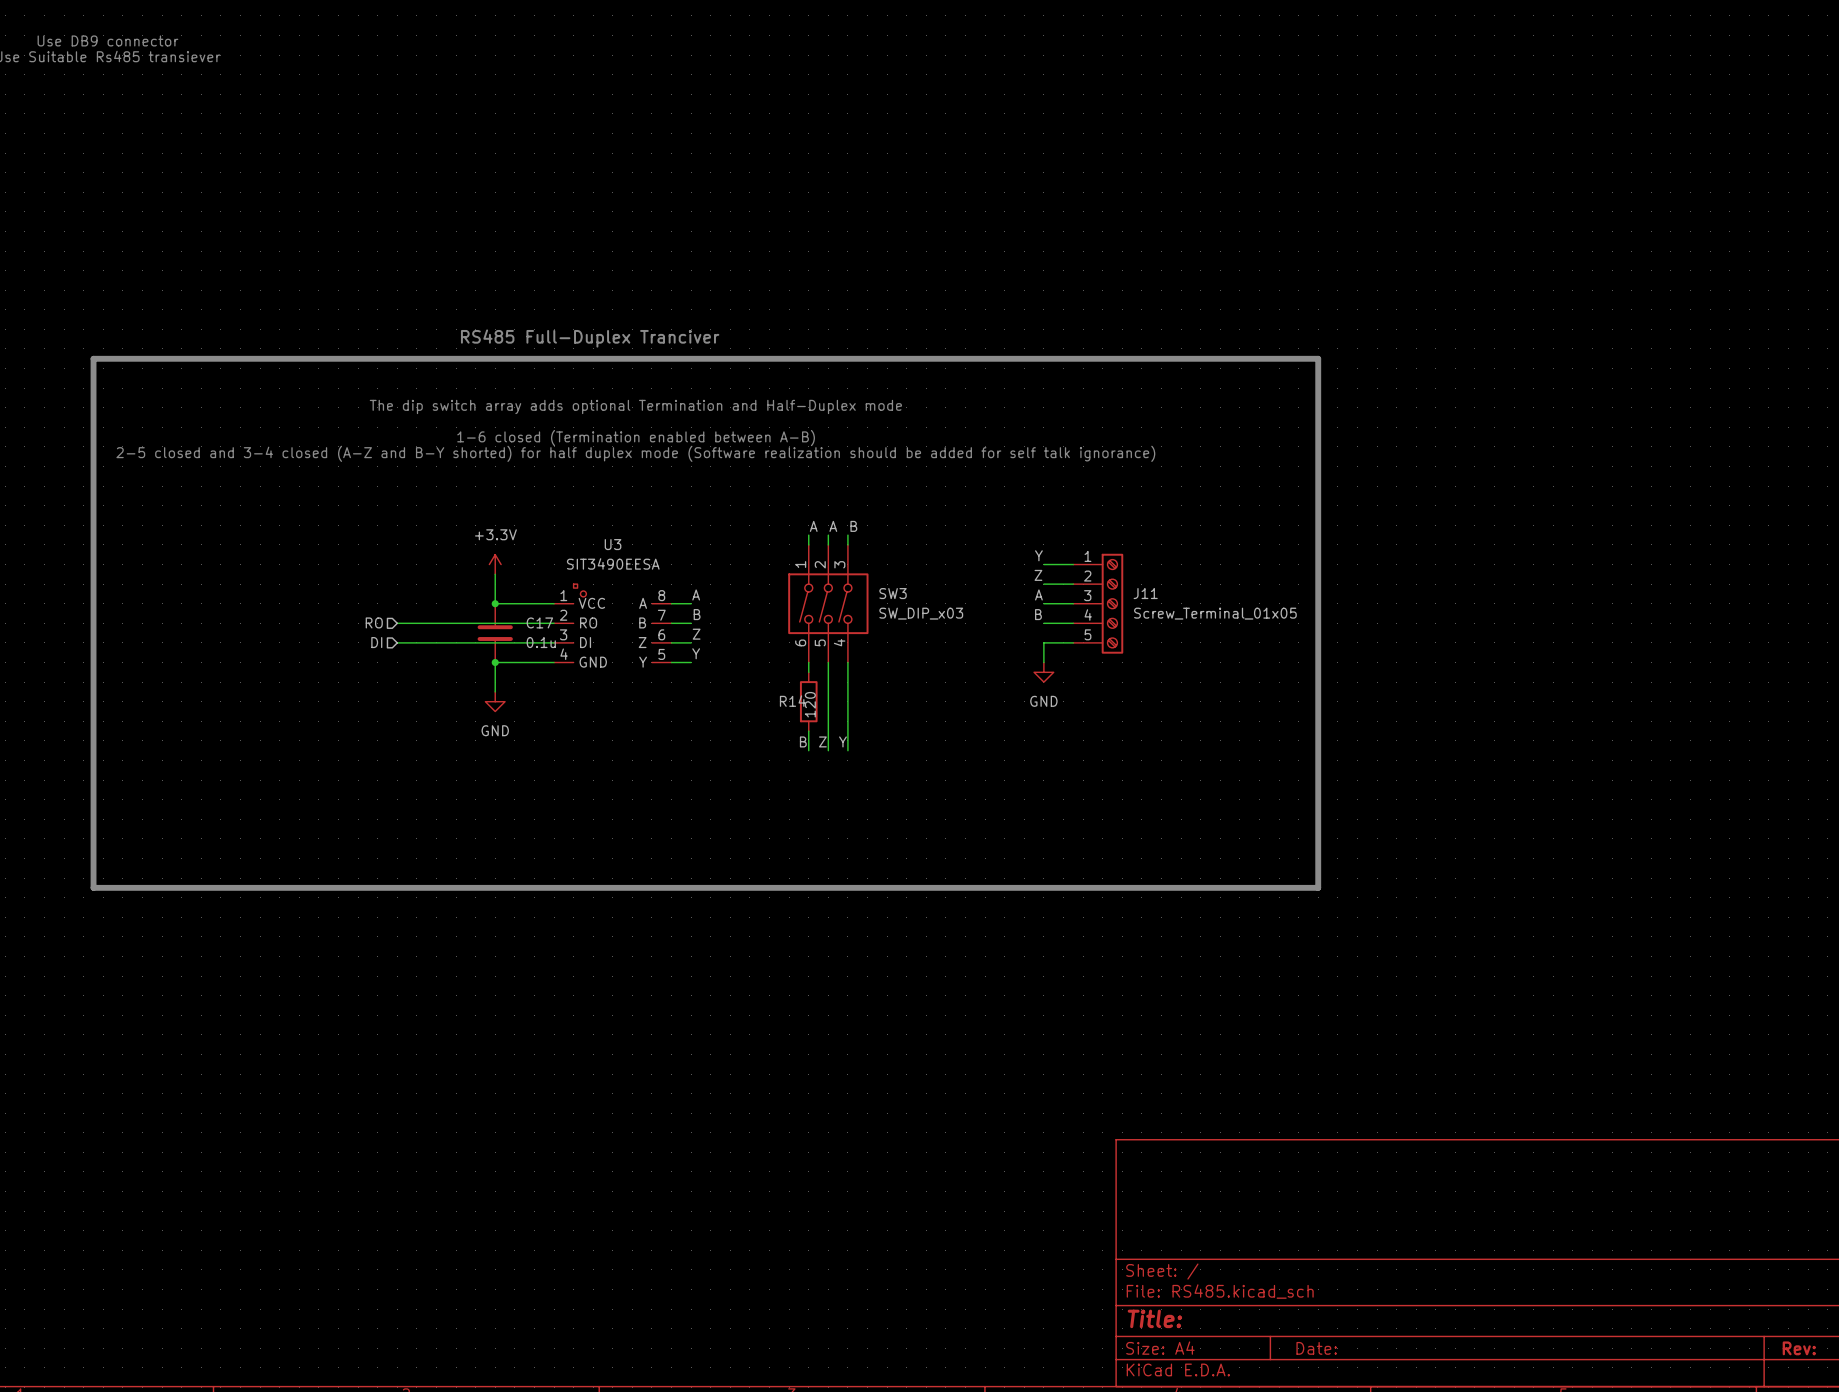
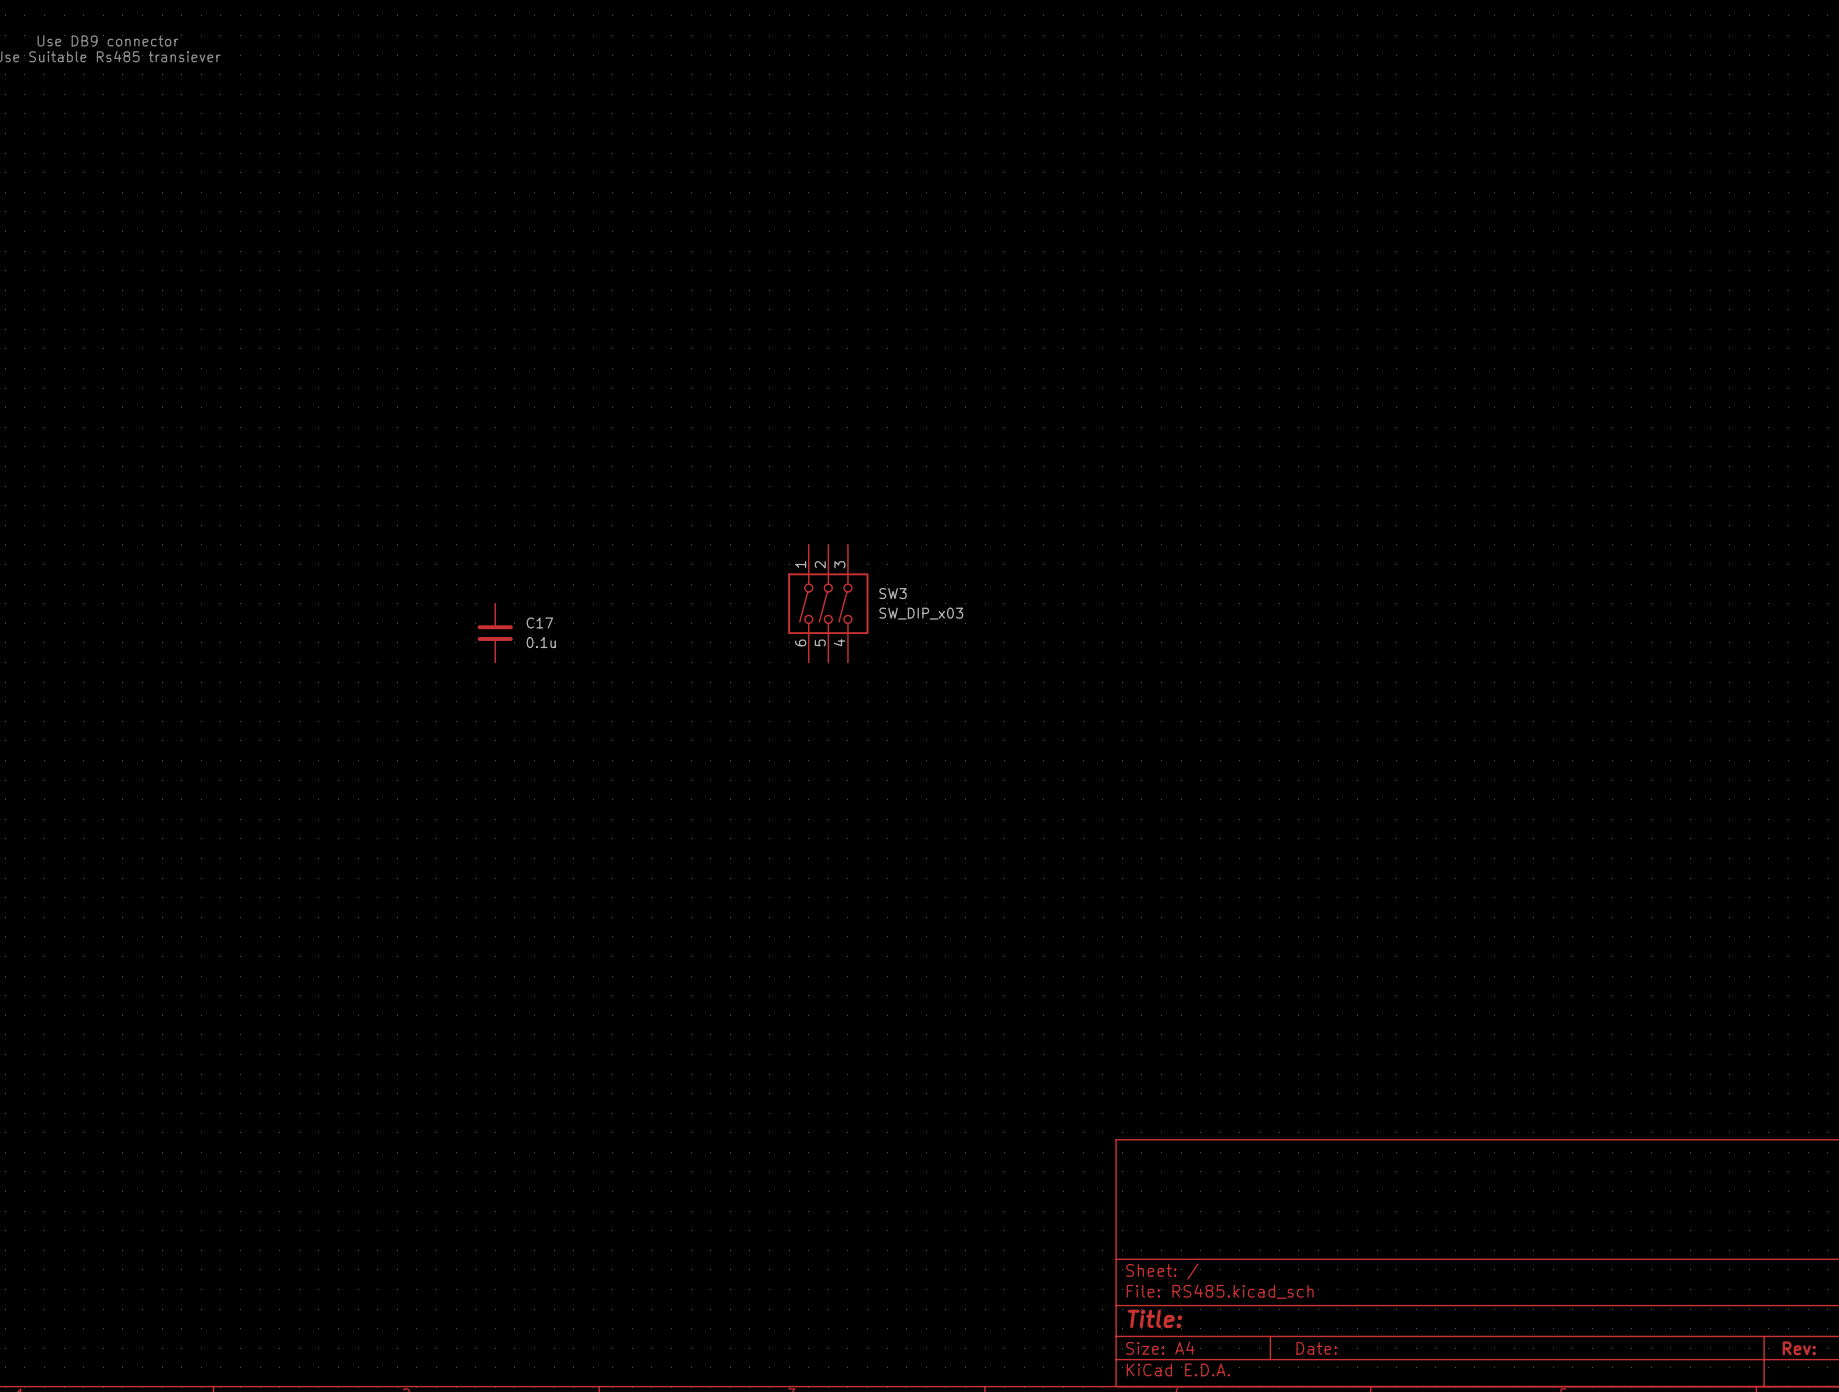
text: RS485 Full-Duplex Tranciver (590, 338) -> none
line: (93, 358) (1318, 358) (1318, 887) (93, 887) (93, 358) -> none
text: The dip switch array adds optional Termination and Half-Duplex mode (635, 406) -> none
text: 1-6 closed (Termination enabled between A-B) (636, 438) -> none
text: 2-5 closed and 3-4 closed (A-Z and B-Y shorted) for half duplex mode (Software realization should be added for self talk ignorance) (635, 453) -> none
label: A (813, 526) -> none
label: A (833, 526) -> none
label: B (853, 526) -> none
wire: (808, 535) (808, 544) -> none
wire: (828, 535) (828, 544) -> none
wire: (847, 535) (847, 544) -> none
label: Y (1038, 555) -> none
power symbol: +3.3V (495, 564) -> none
wire: (1043, 564) (1073, 564) -> none
wire: (495, 574) (495, 603) (554, 603) -> none
label: Z (1038, 575) -> none
wire: (1043, 584) (1073, 584) -> none
label: A (696, 594) -> none
label: A (1038, 594) -> none
junction: (495, 603) -> none
wire: (671, 603) (691, 603) -> none
wire: (1043, 603) (1073, 603) -> none
J11: Screw_Terminal_01x05 (1098, 603) -> none
label: B (697, 614) -> none
label: B (1038, 614) -> none
hierarchical label: RO (374, 622) -> none
wire: (397, 623) (554, 623) -> none
U3: SIT3490EESA (612, 623) -> none
wire: (671, 623) (691, 623) -> none
wire: (1043, 623) (1073, 623) -> none
label: Z (696, 634) -> none
hierarchical label: DI (376, 642) -> none
wire: (397, 642) (554, 642) -> none
wire: (671, 642) (691, 642) -> none
wire: (1073, 642) (1043, 642) (1043, 662) -> none
label: Y (696, 653) -> none
junction: (495, 662) -> none
wire: (554, 662) (495, 662) (495, 691) -> none
wire: (671, 662) (691, 662) -> none
wire: (808, 662) (808, 672) -> none
wire: (828, 662) (828, 750) -> none
wire: (847, 662) (847, 750) -> none
power symbol: GND (1043, 672) -> none
power symbol: GND (495, 701) -> none
R14: 120 (808, 701) -> none
wire: (808, 731) (808, 750) -> none
label: B (803, 741) -> none
label: Z (822, 741) -> none
label: Y (842, 741) -> none

